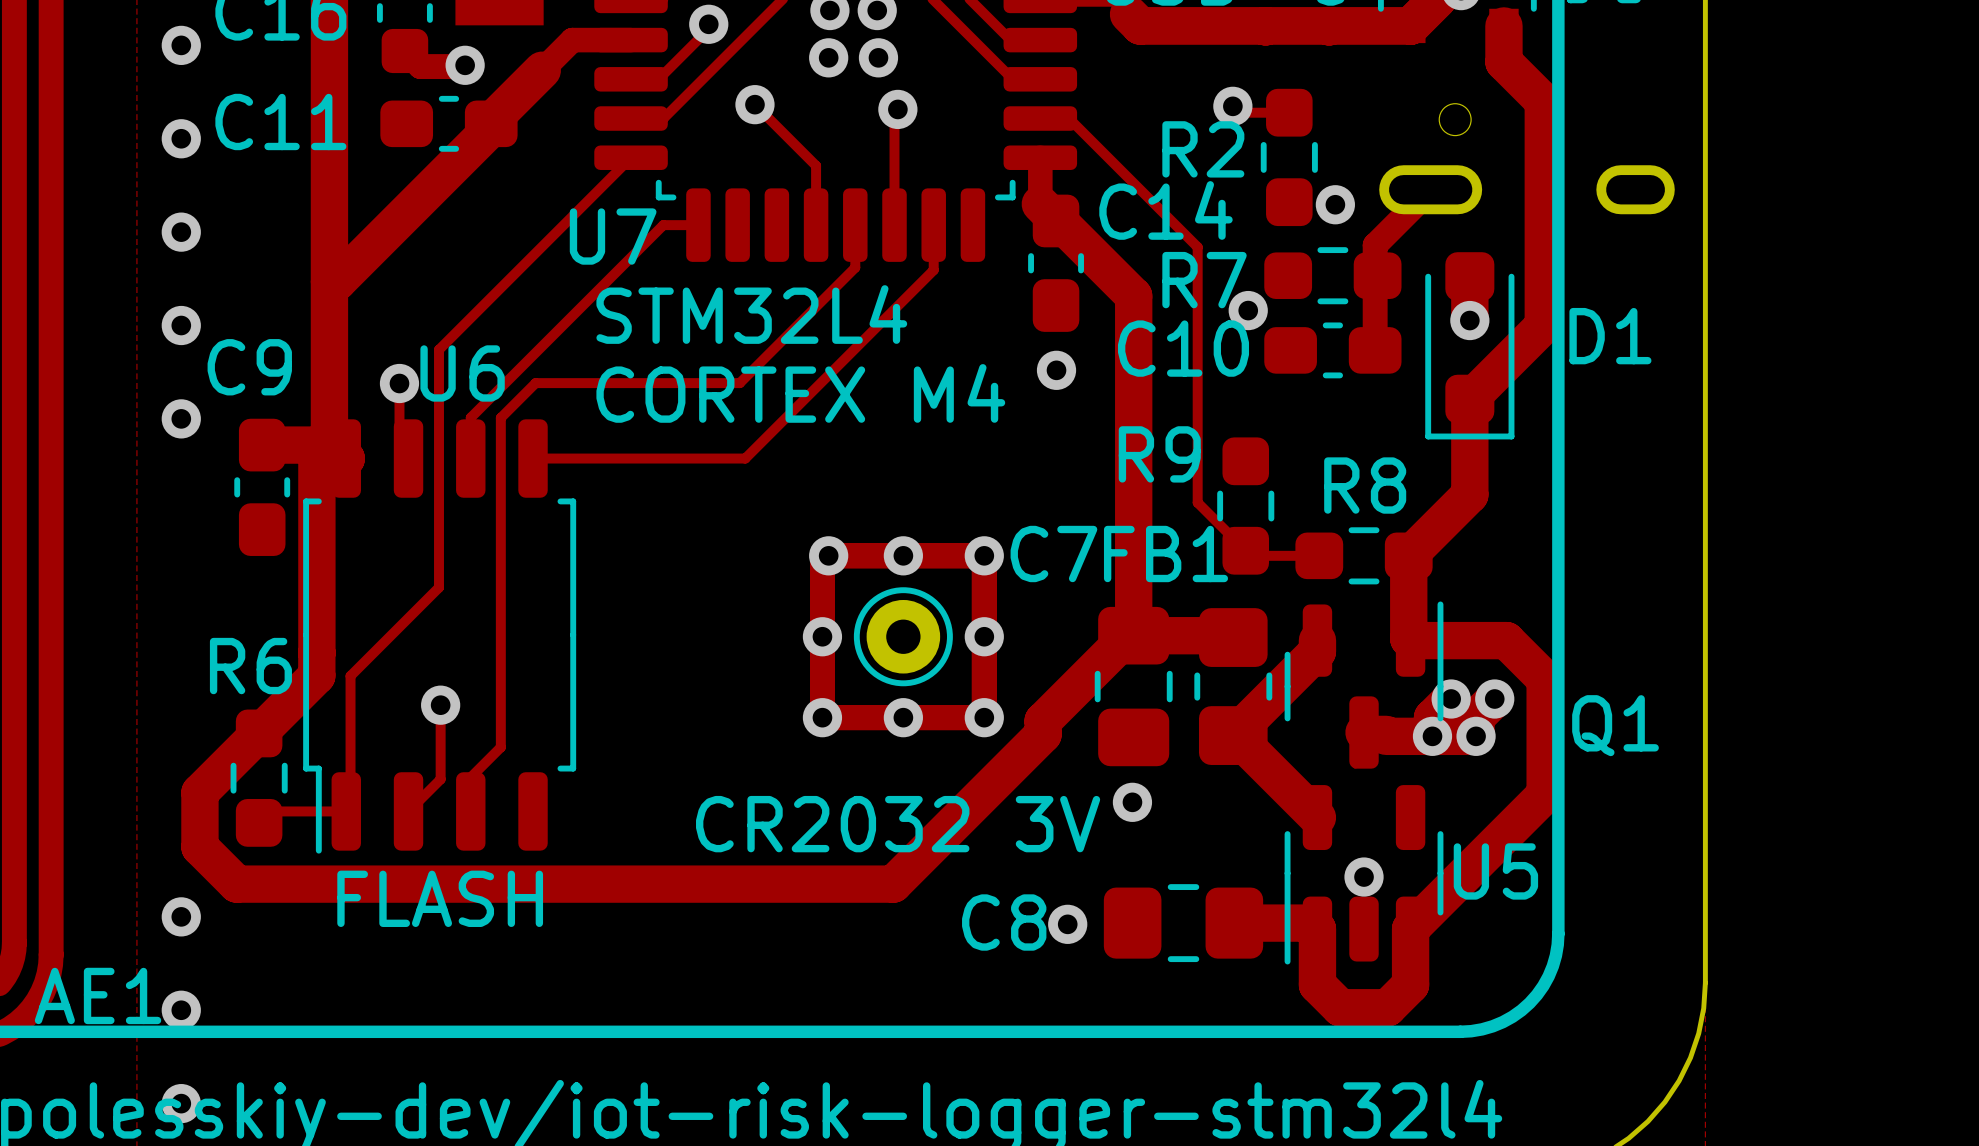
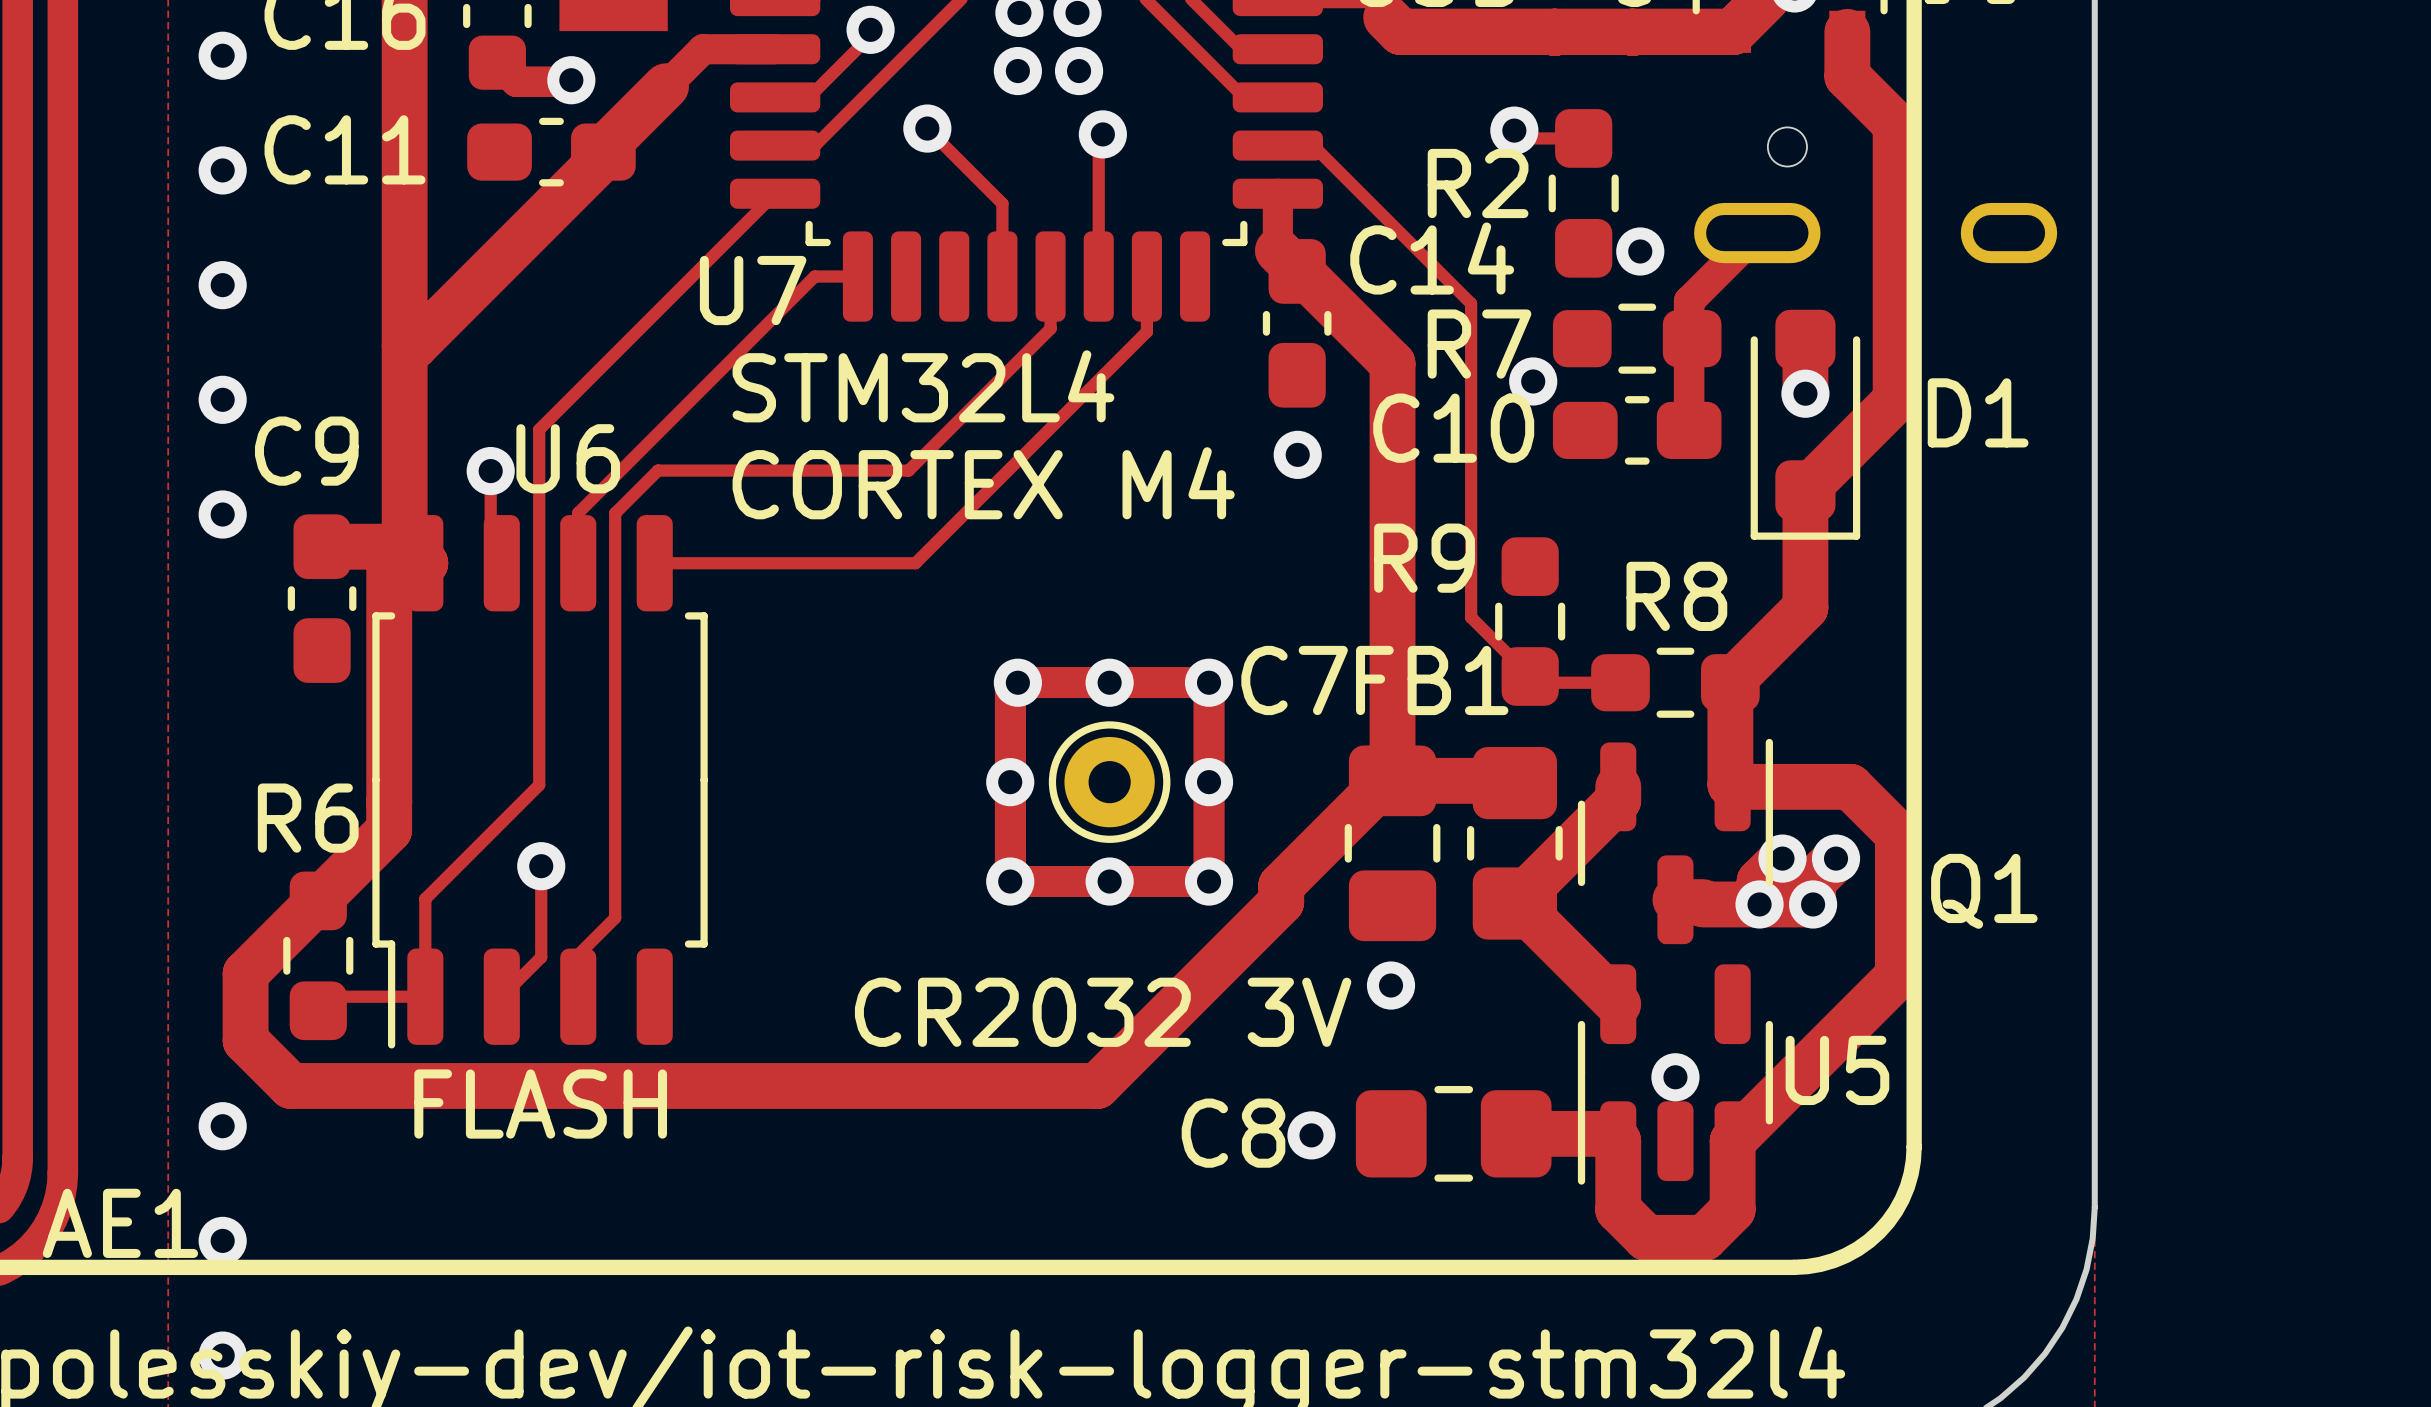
track: (439, 587) (350, 676) (350, 807) (346, 811) -> (539, 721) (539, 785) (425, 898) (425, 996)

